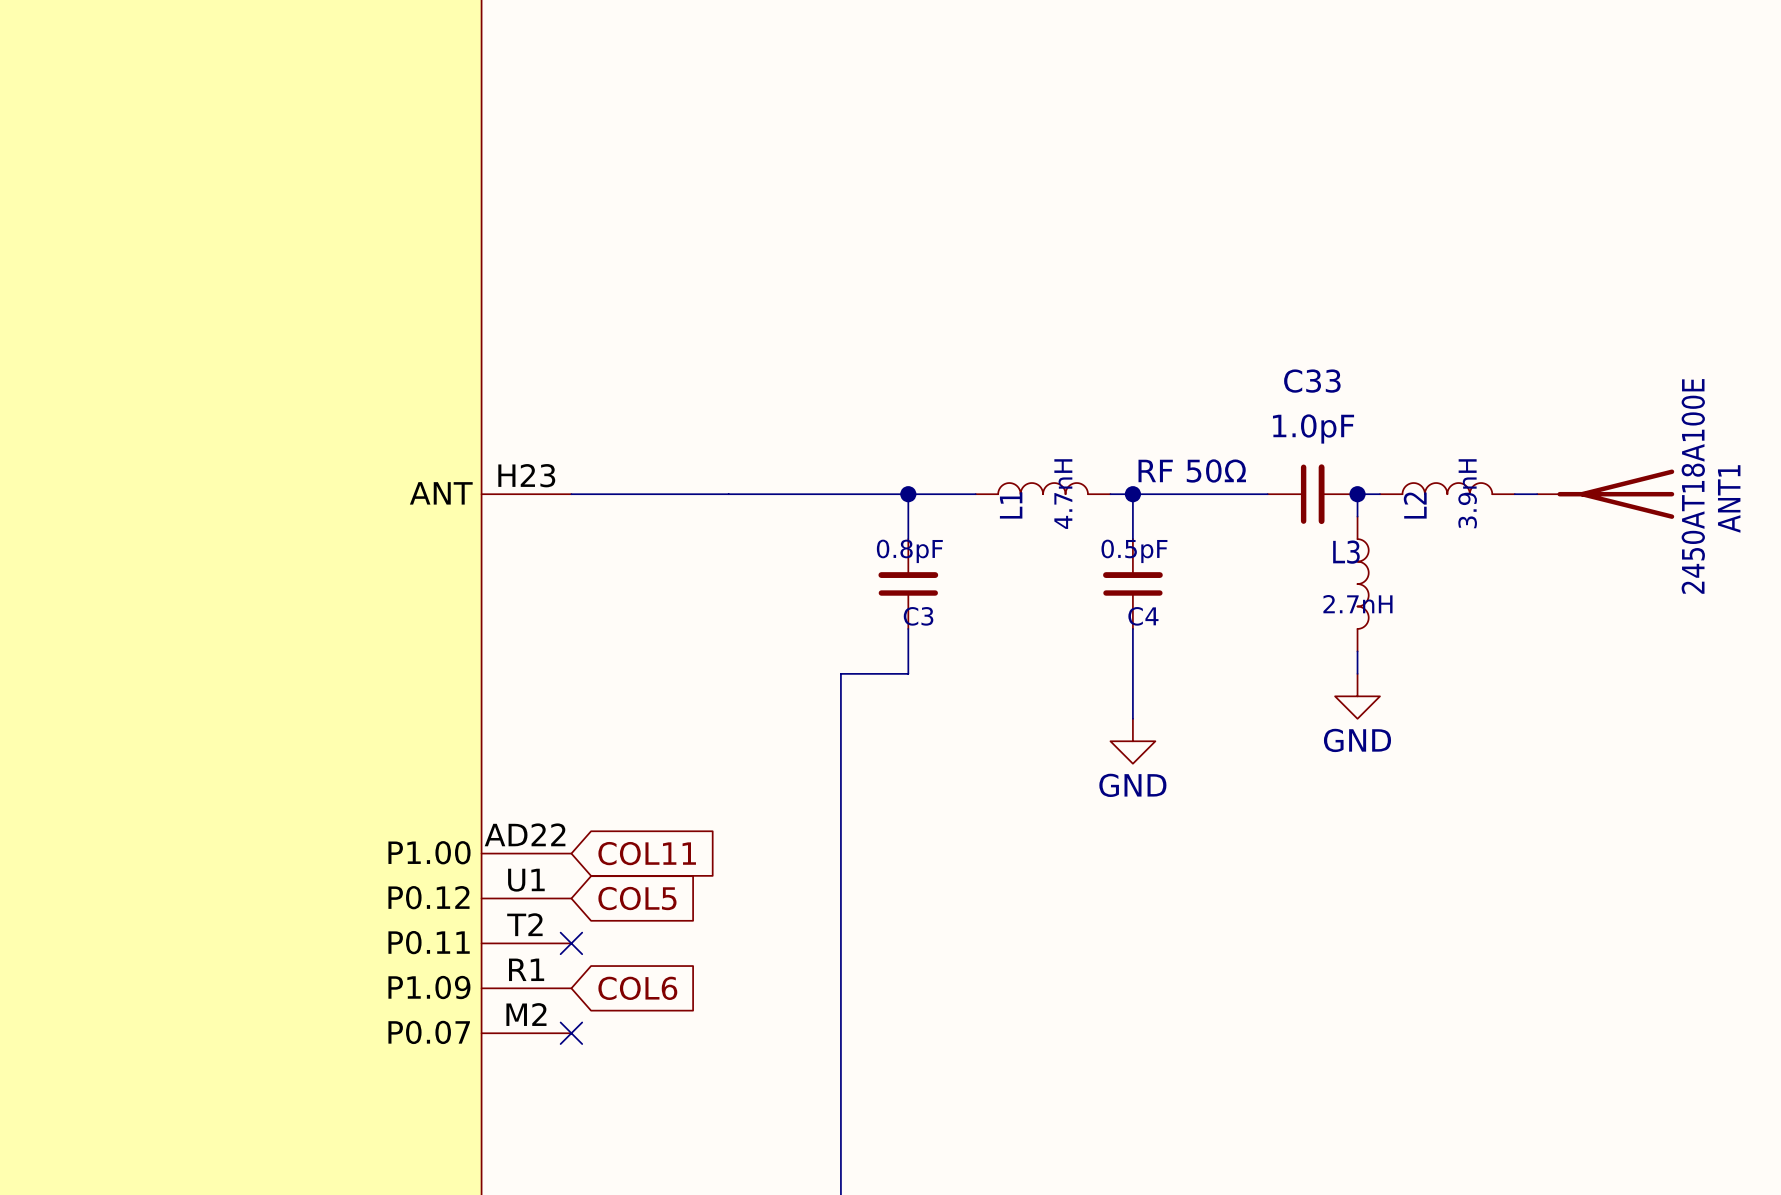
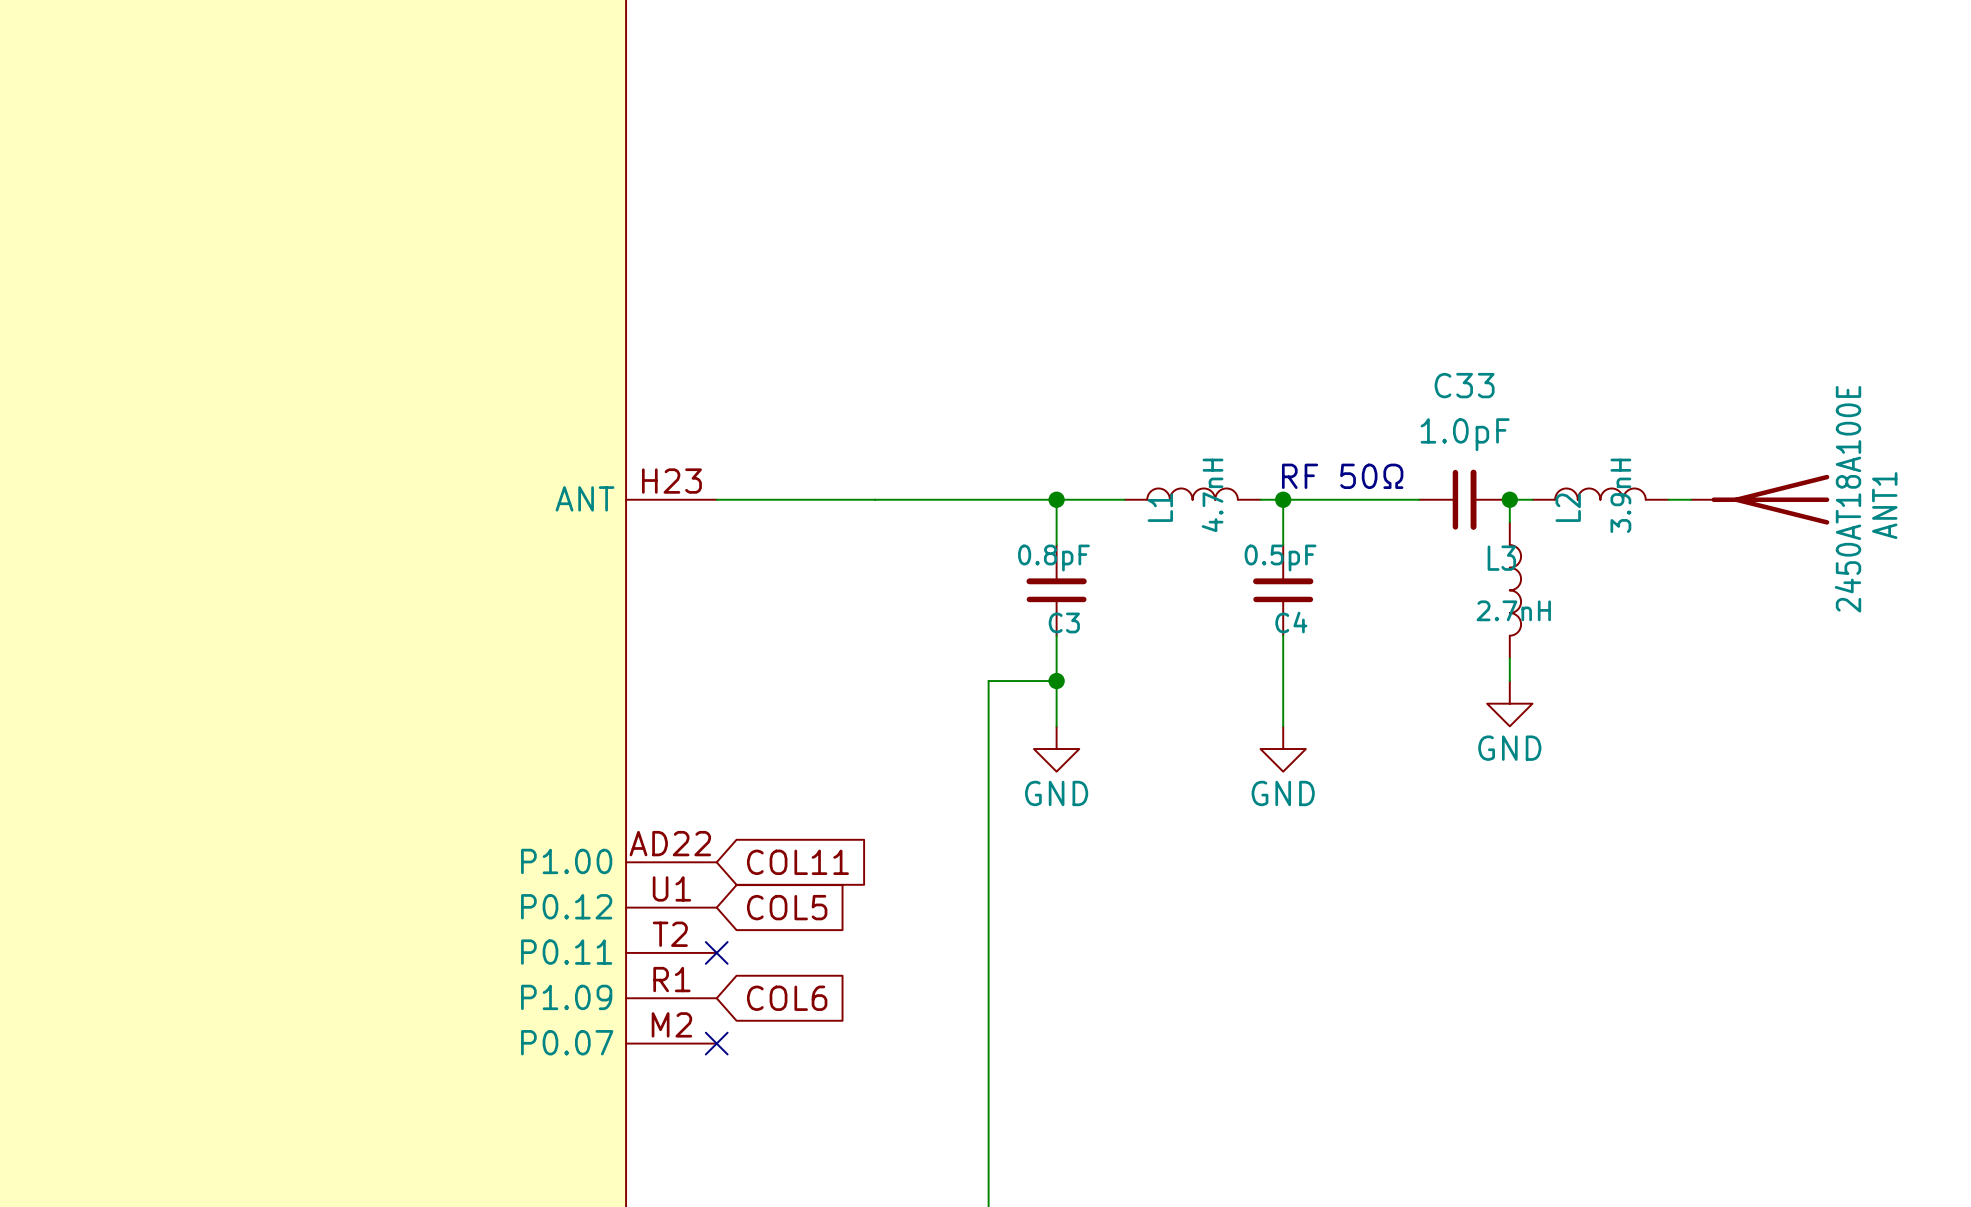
wire: none -> (1056, 681) (1056, 726)
junction: none -> (1056, 681)
power symbol: none -> GND (1056, 749)

